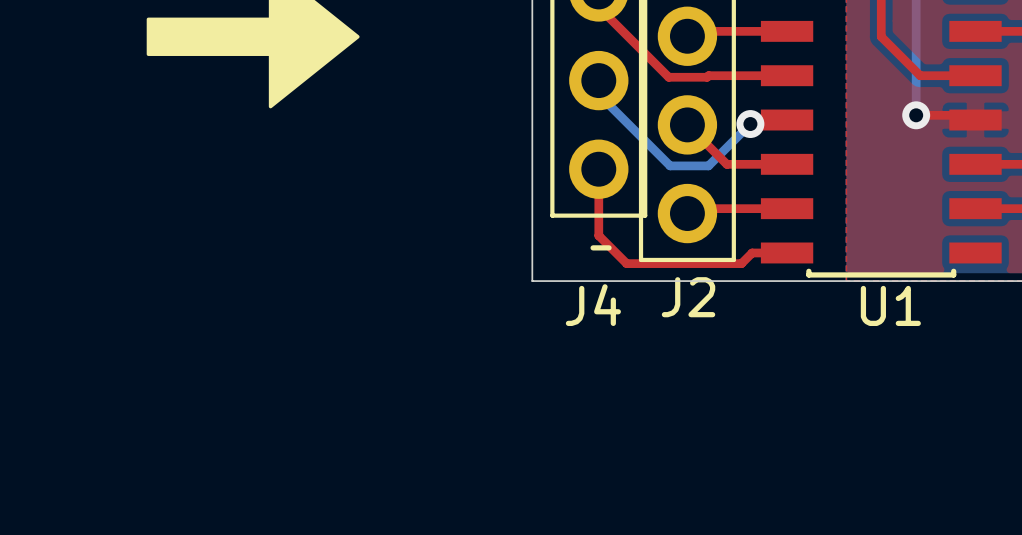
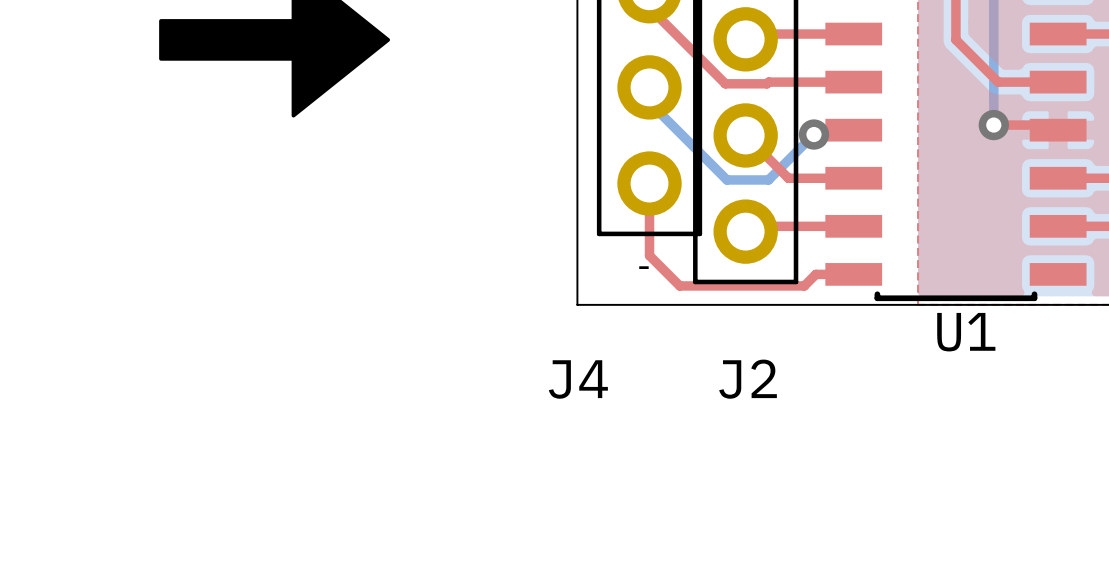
J2 name position: J2 (688, 297) -> J2 (748, 379)
J4 name position: J4 (593, 305) -> J4 (578, 379)

